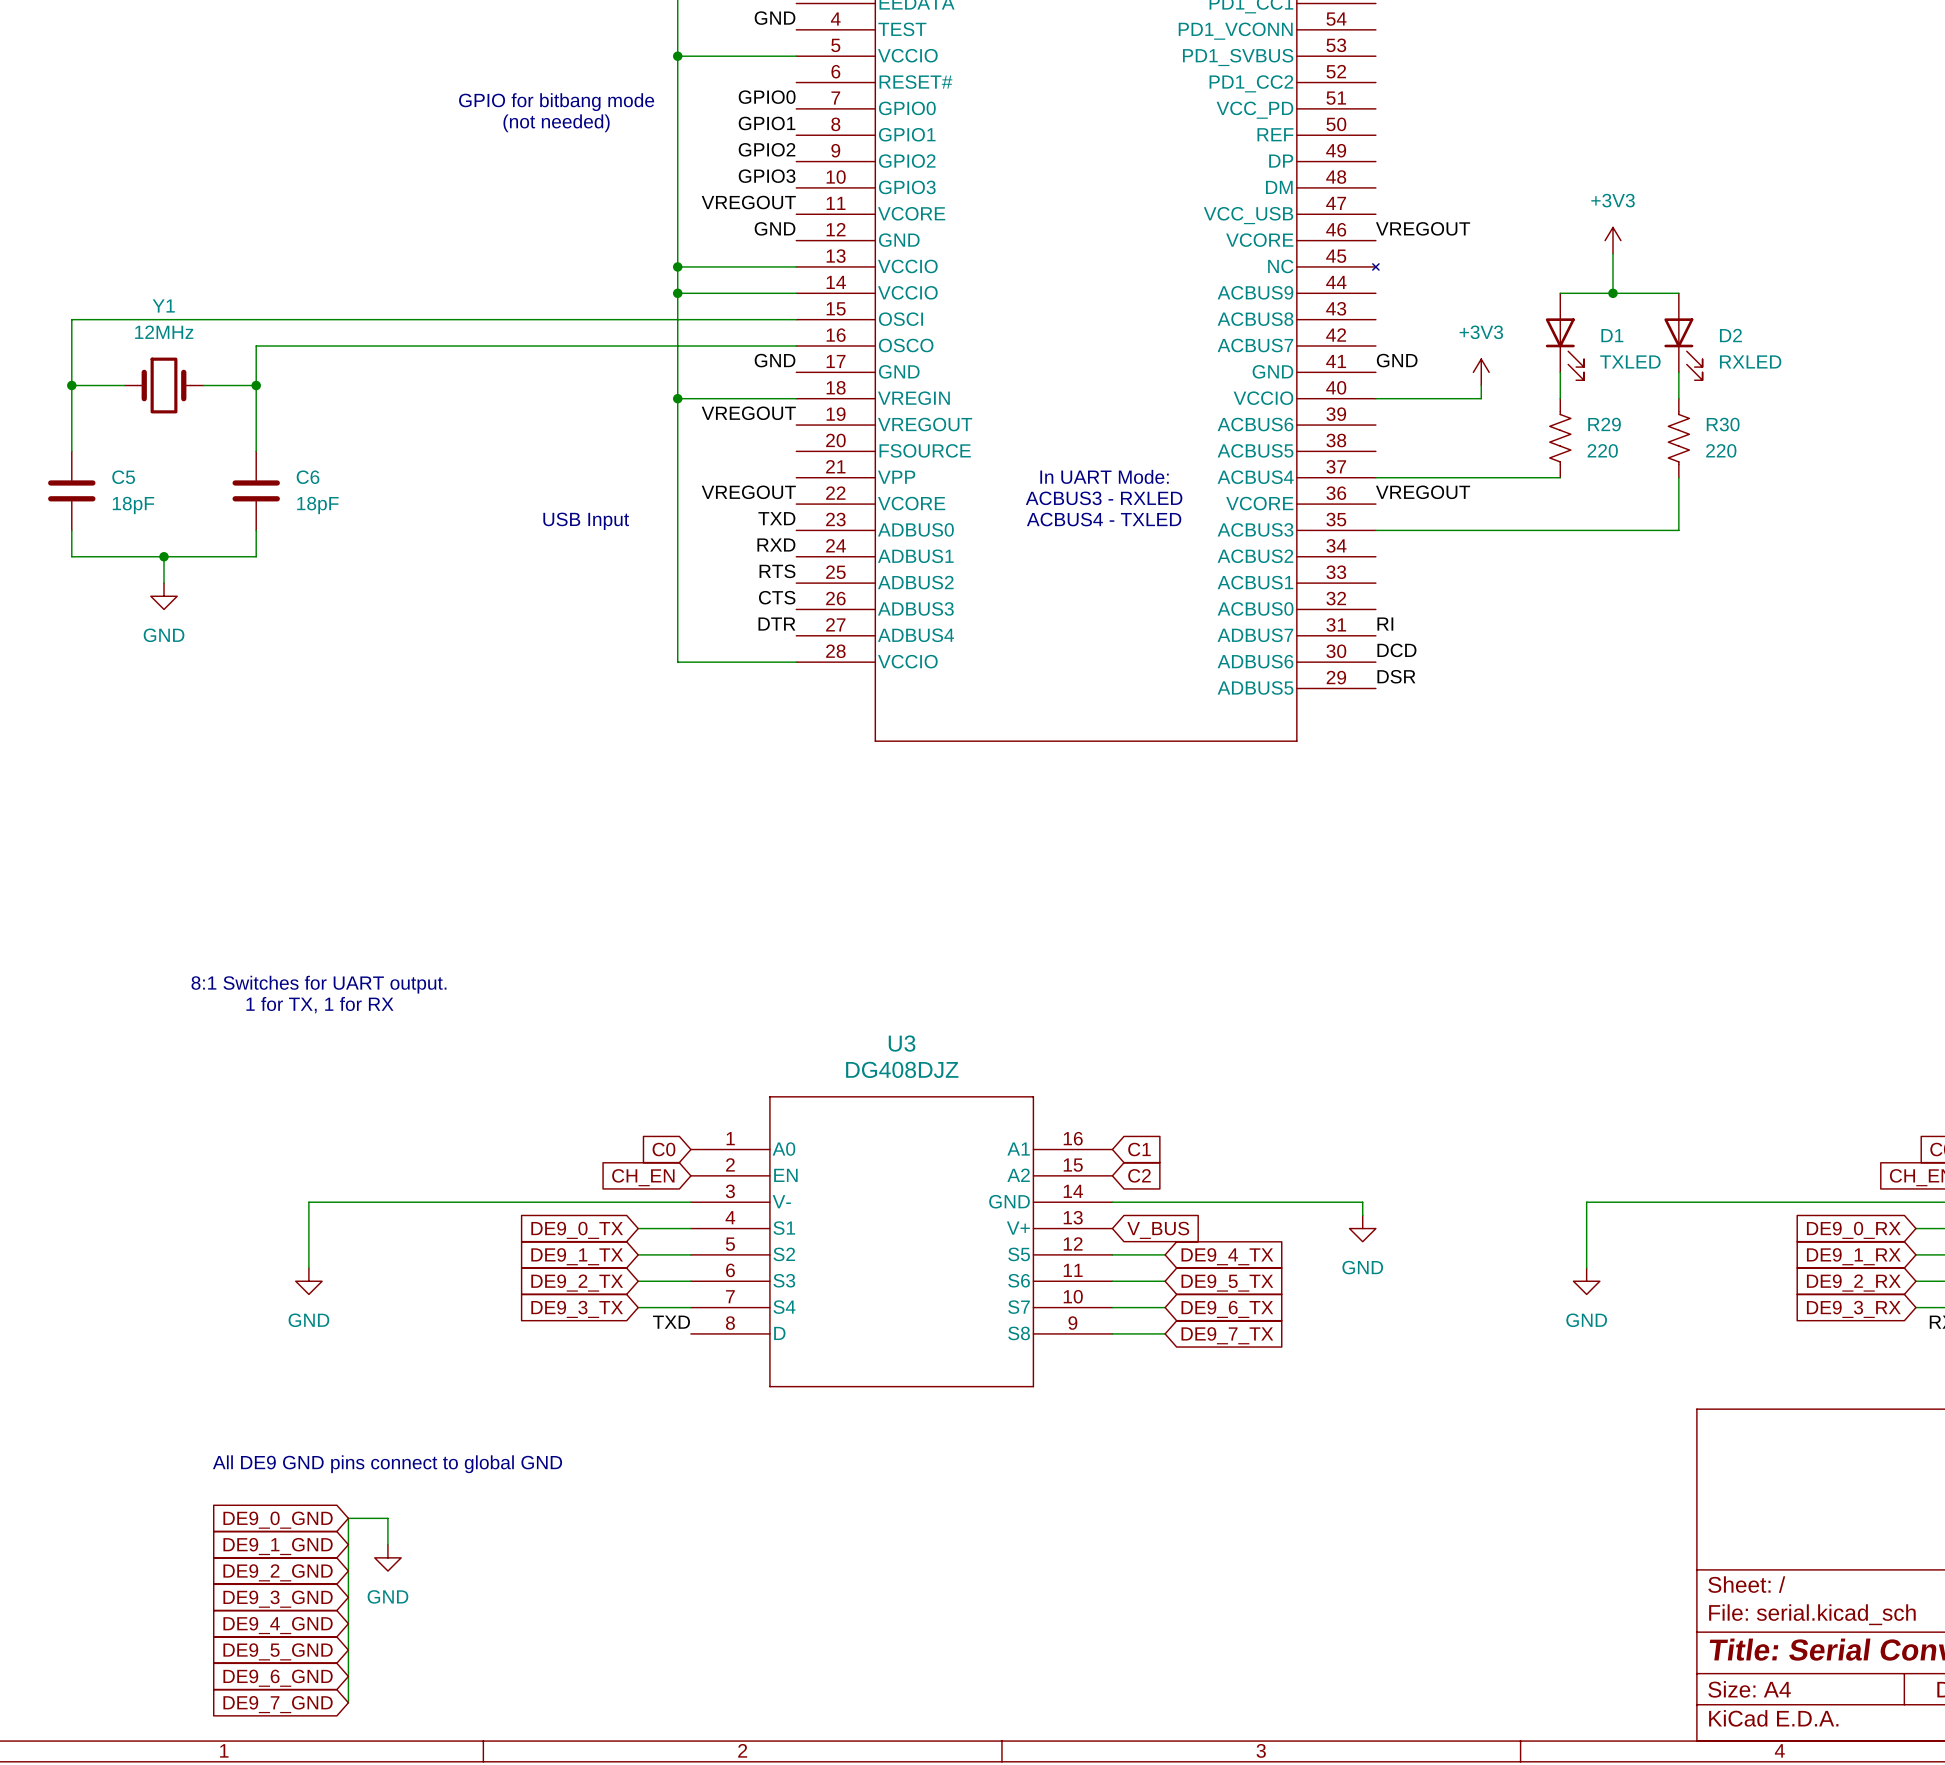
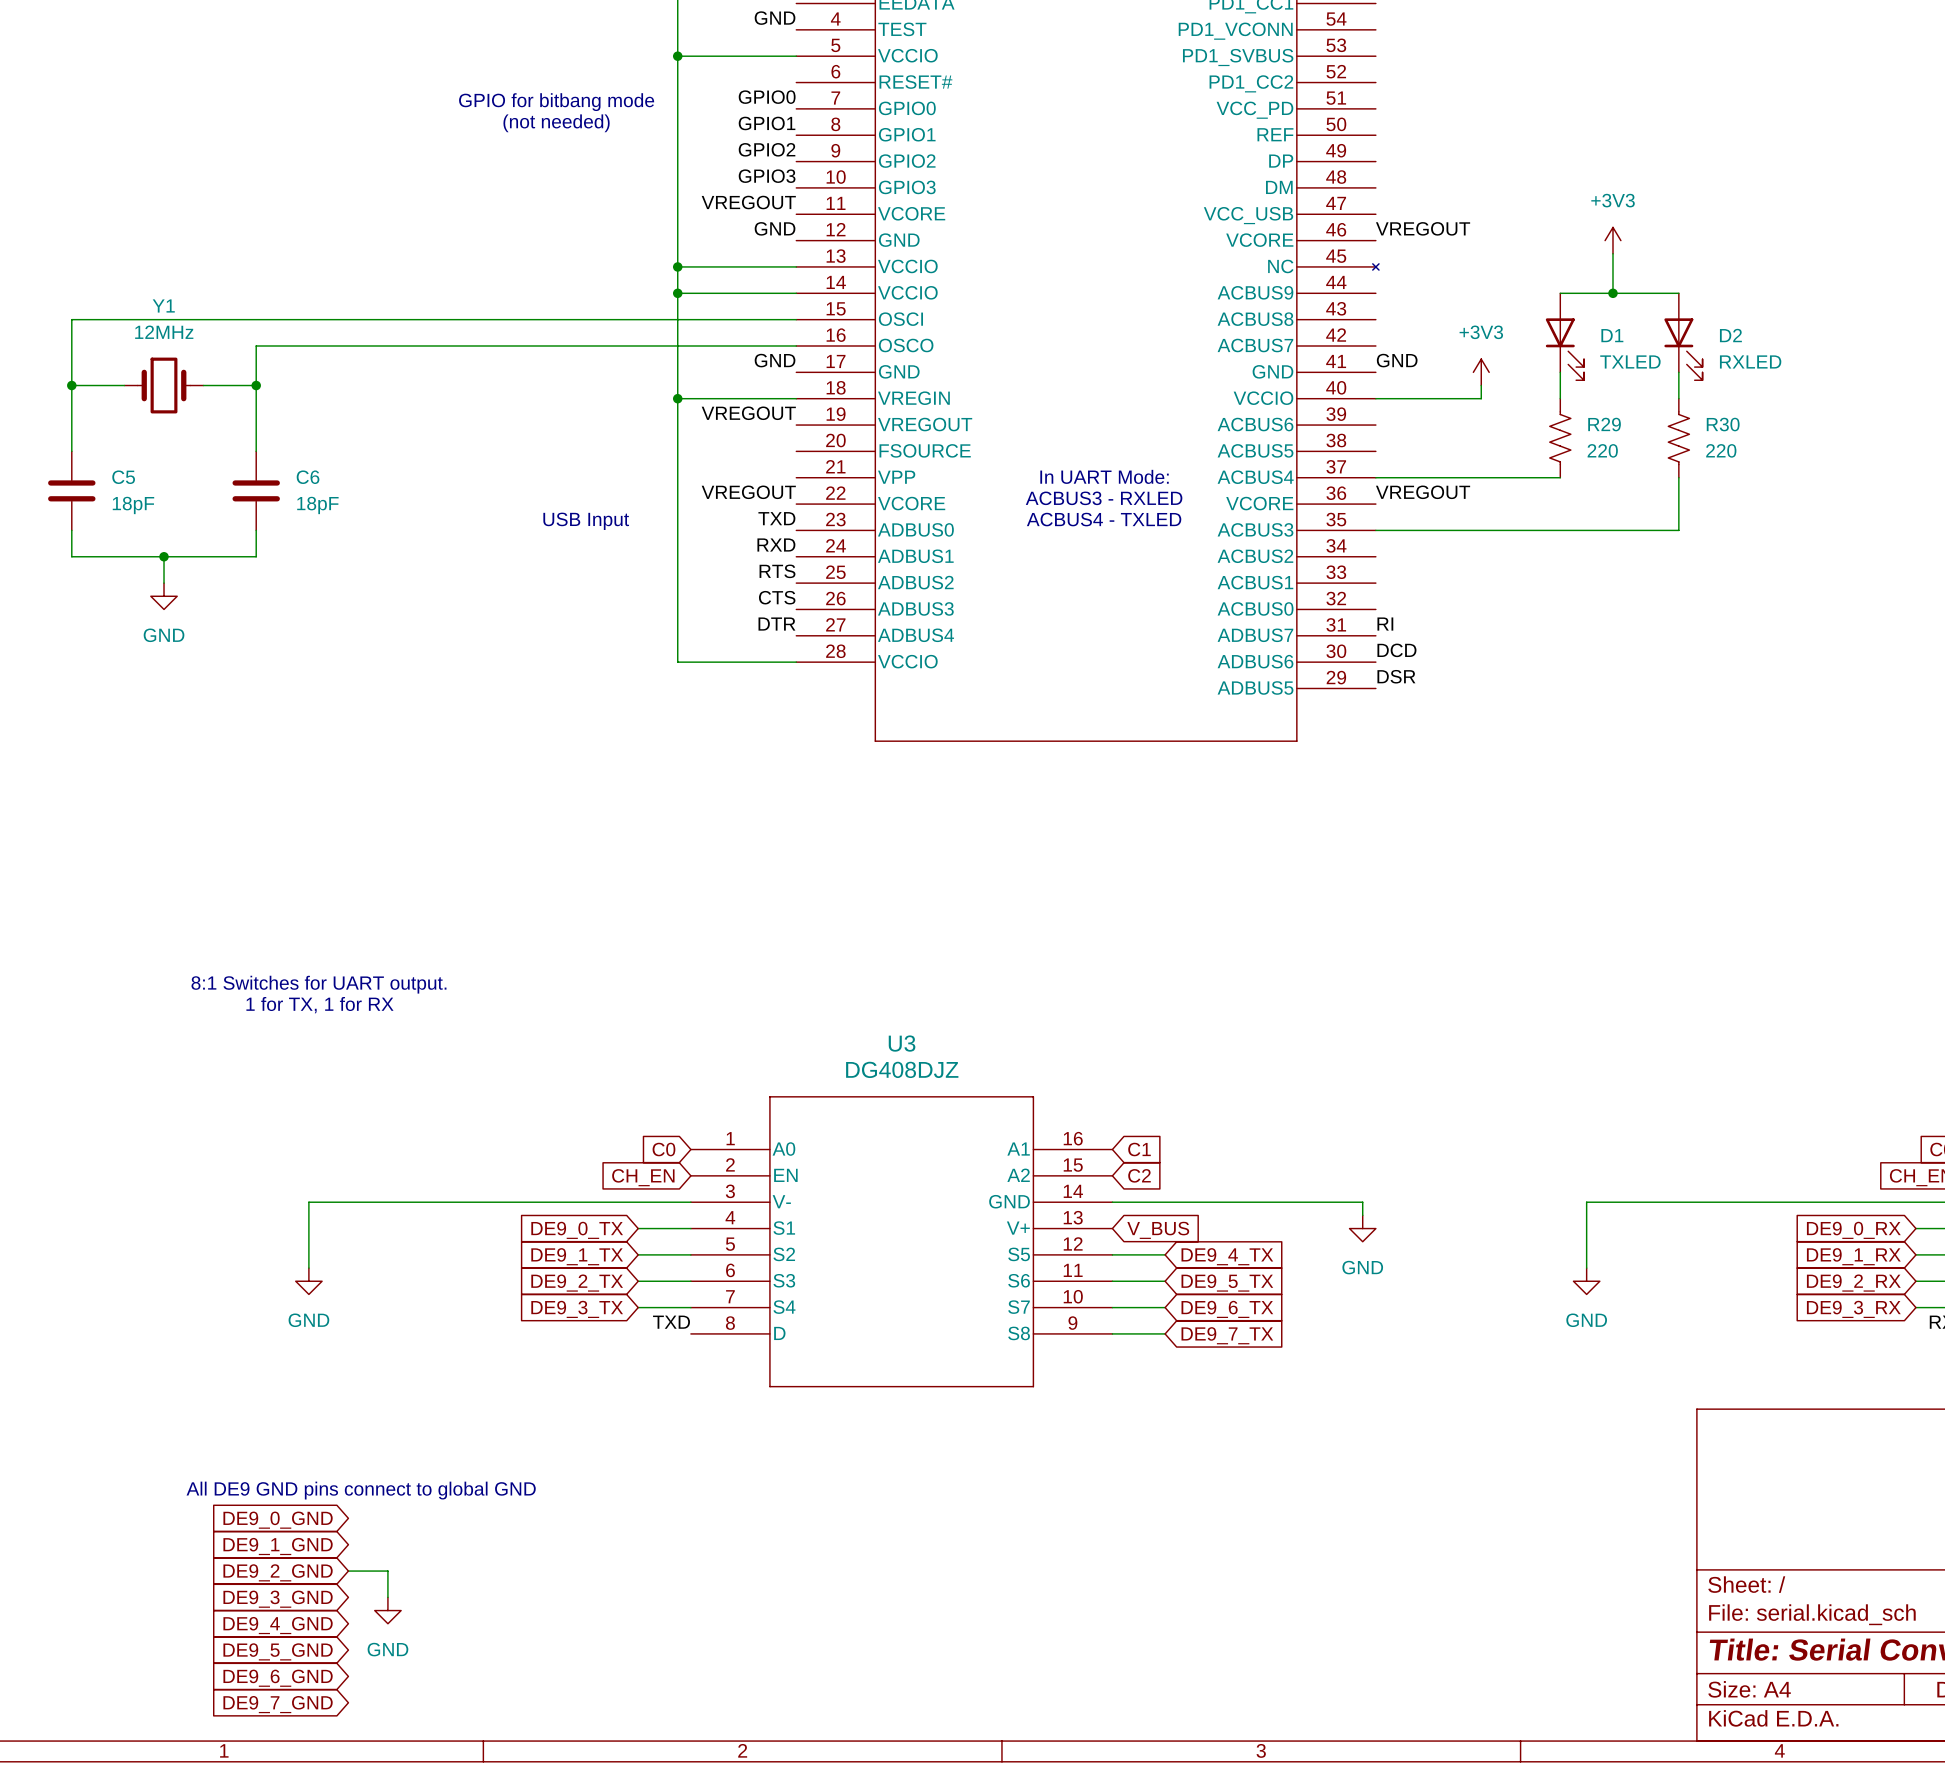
text position: All DE9 GND pins connect to global GND (387, 1464) -> All DE9 GND pins connect to global GND (361, 1490)
wire: (387, 1544) (387, 1518) (348, 1518) (348, 1702) -> none
power symbol position: GND (387, 1557) -> GND (387, 1610)
wire: none -> (348, 1571) (387, 1571) (387, 1597)

